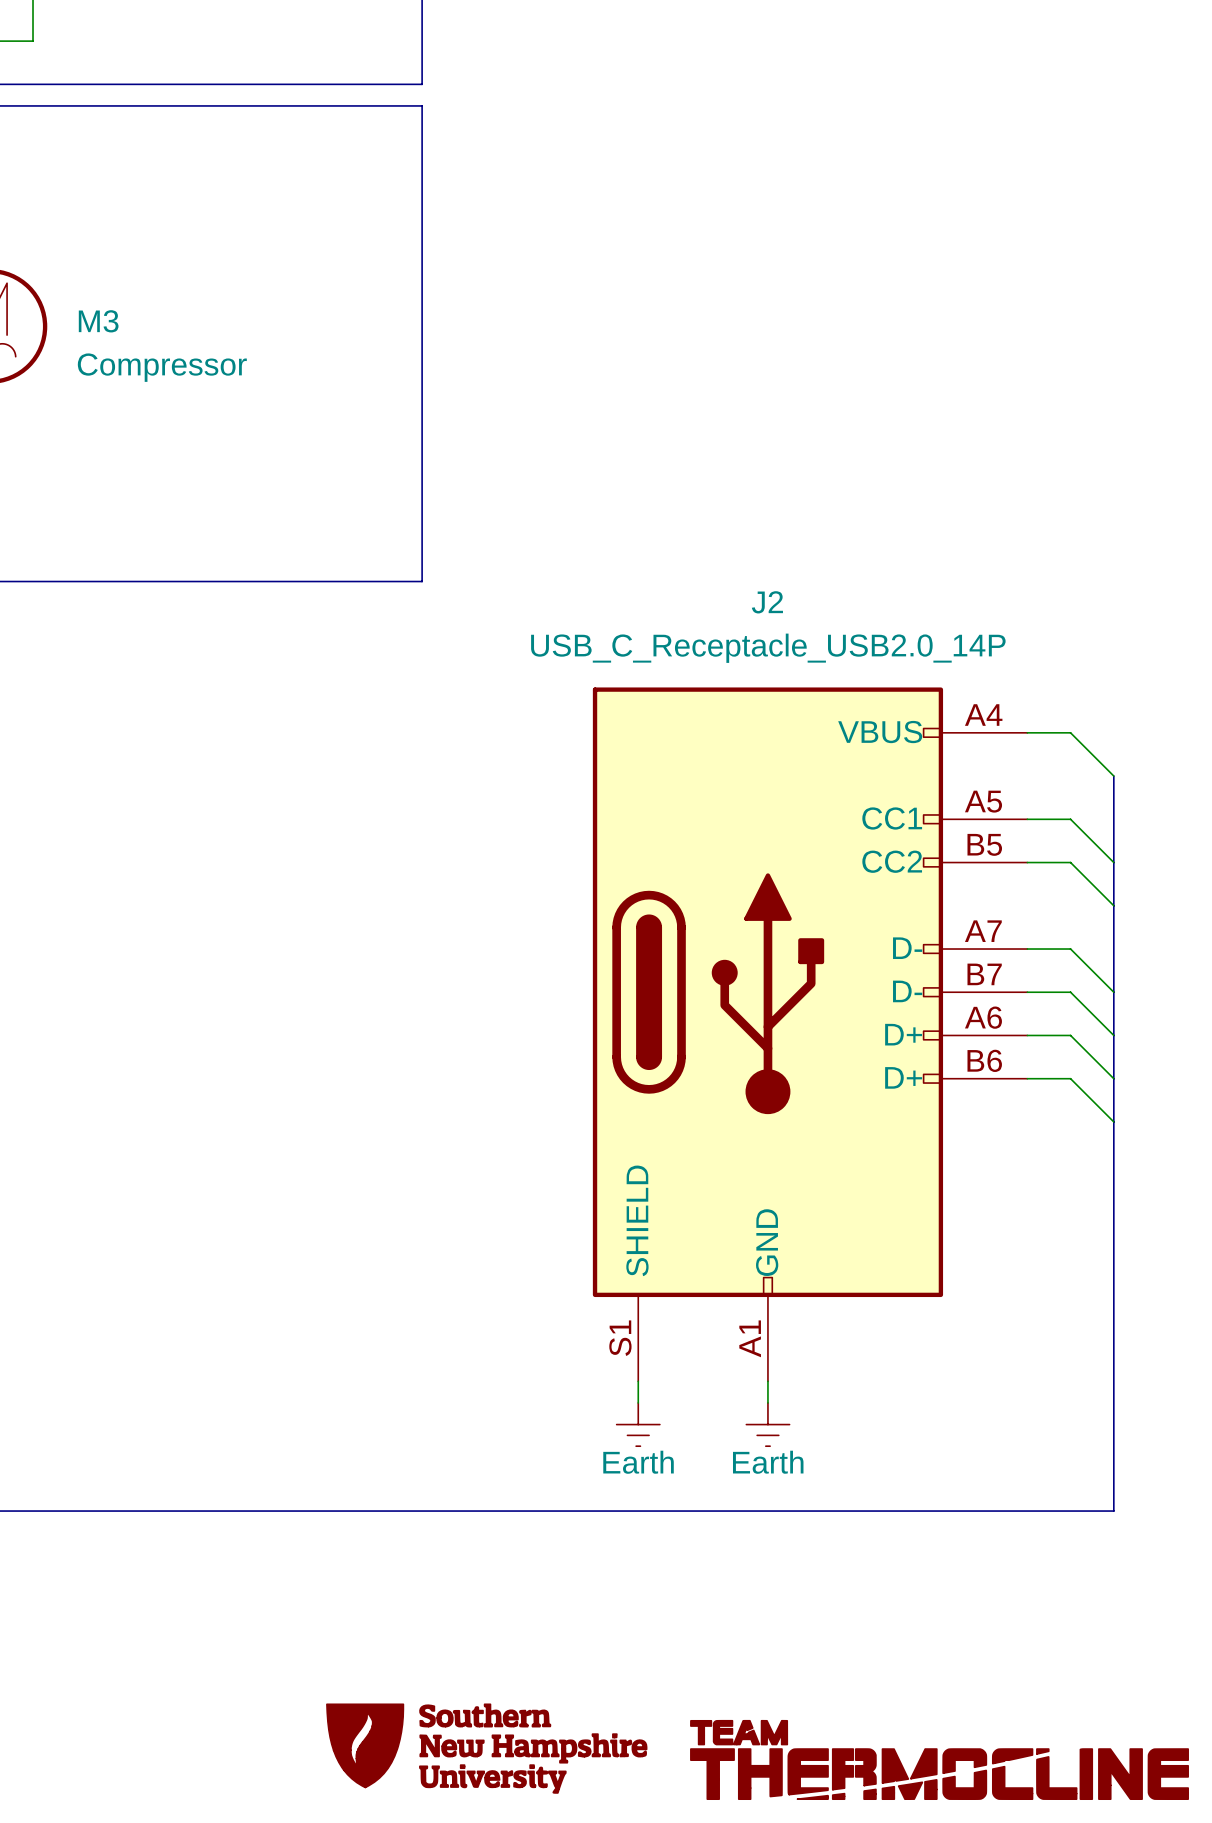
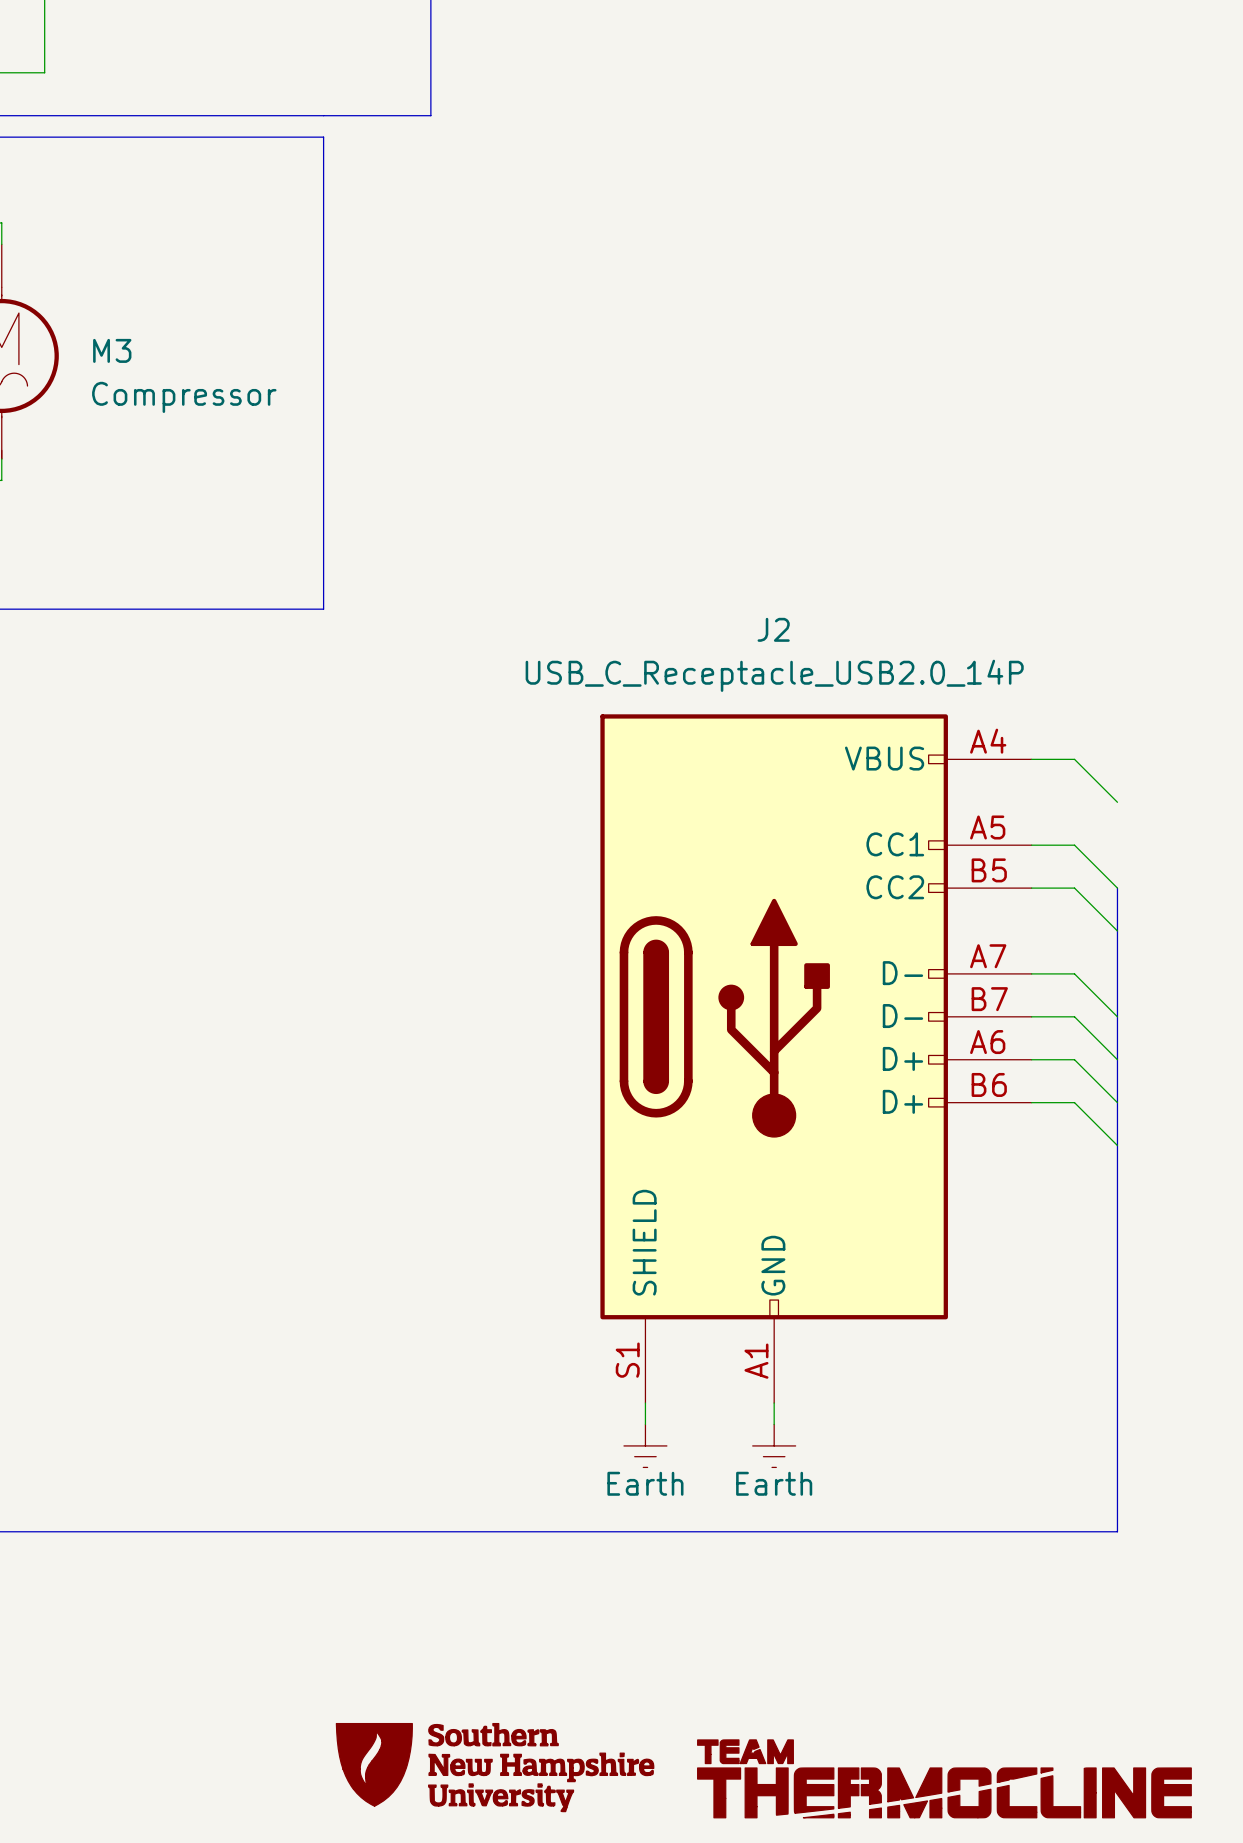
line: (314, 105) (422, 105) (422, 581) (314, 581) -> (323, 137) (323, 609)
bus: (1113, 776) (1113, 862) -> none

